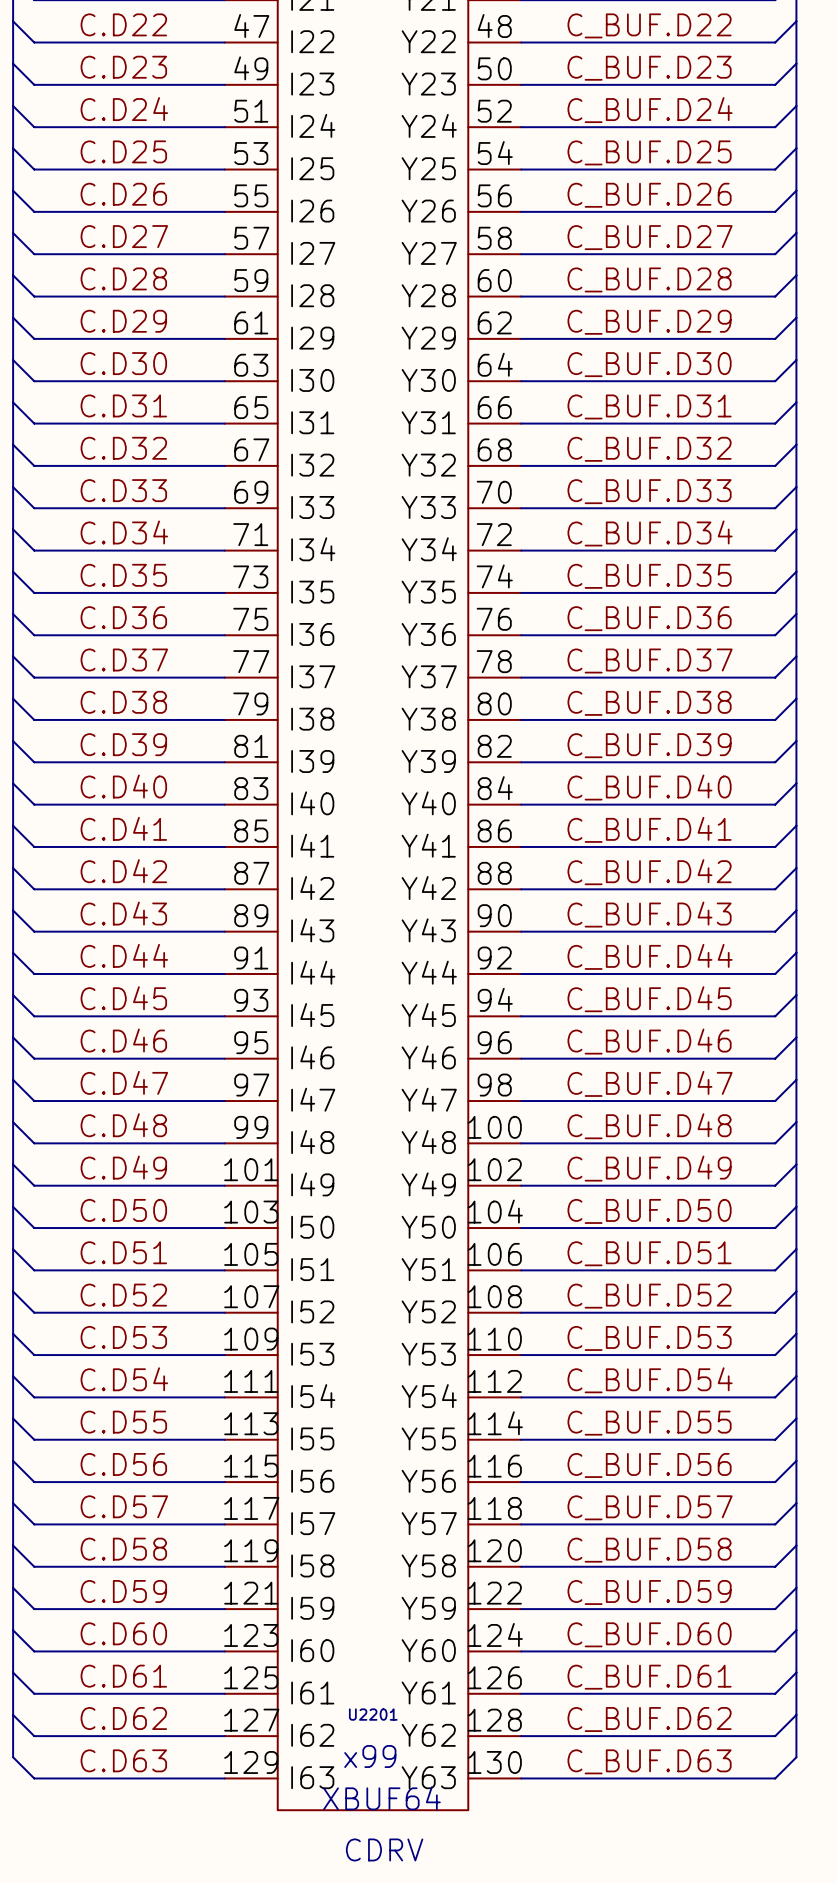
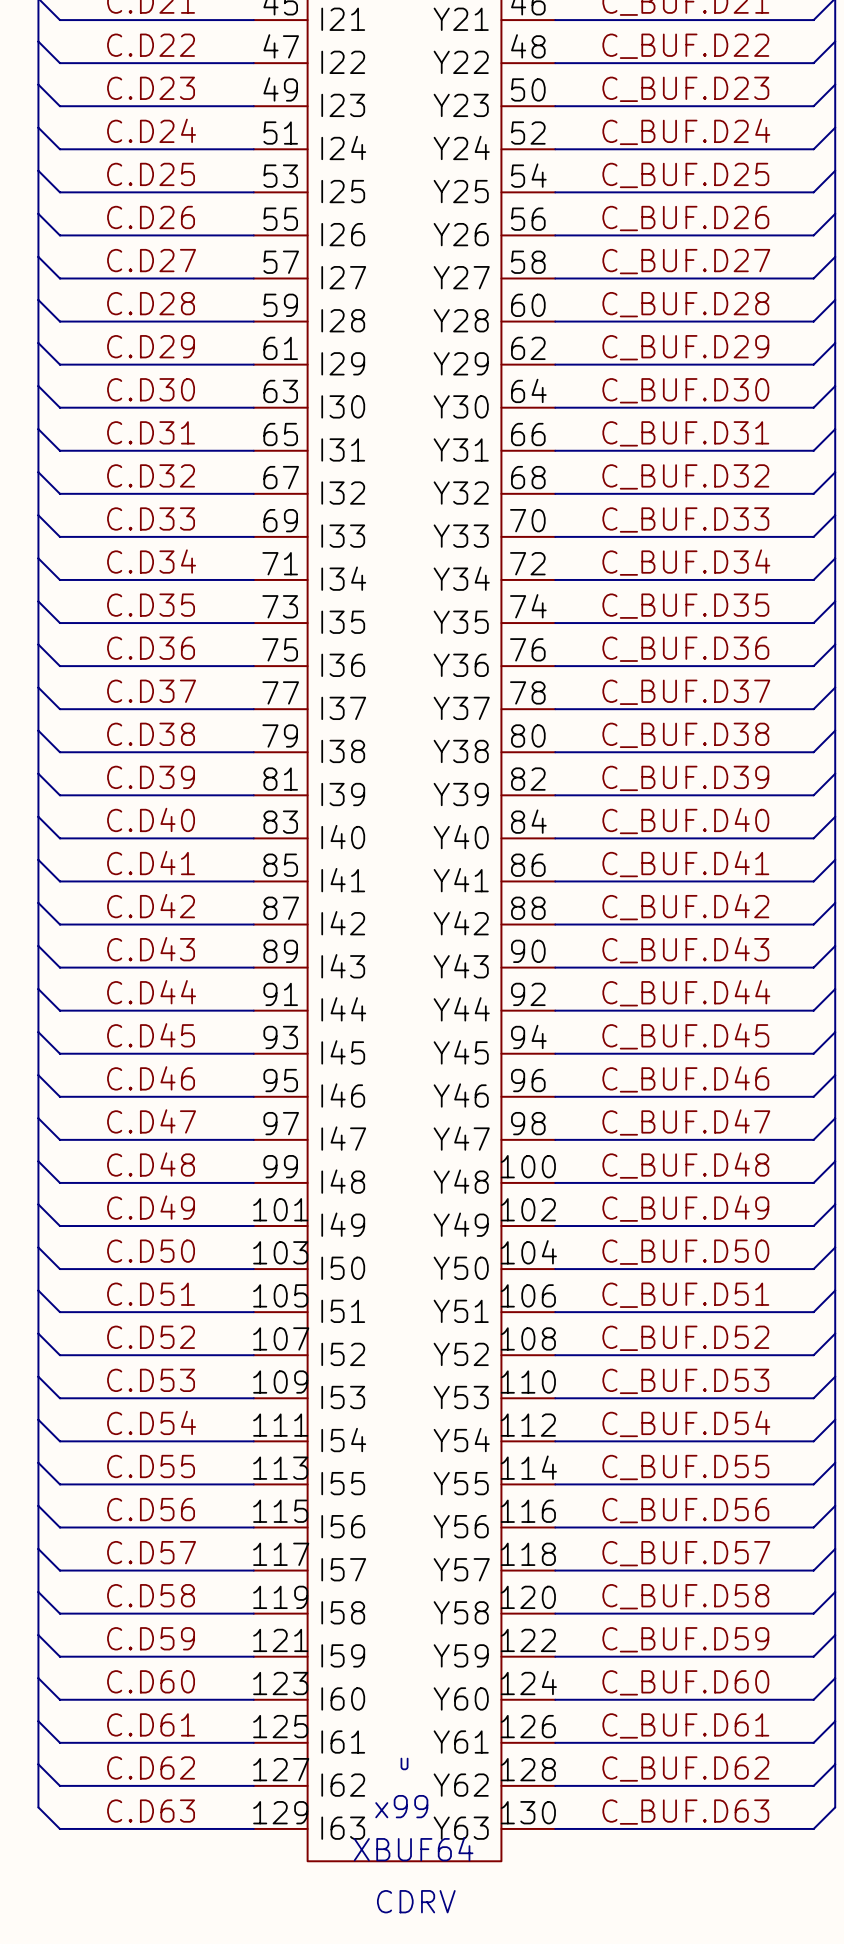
U2201 name: U2201 (373, 1714) -> U (404, 1763)

